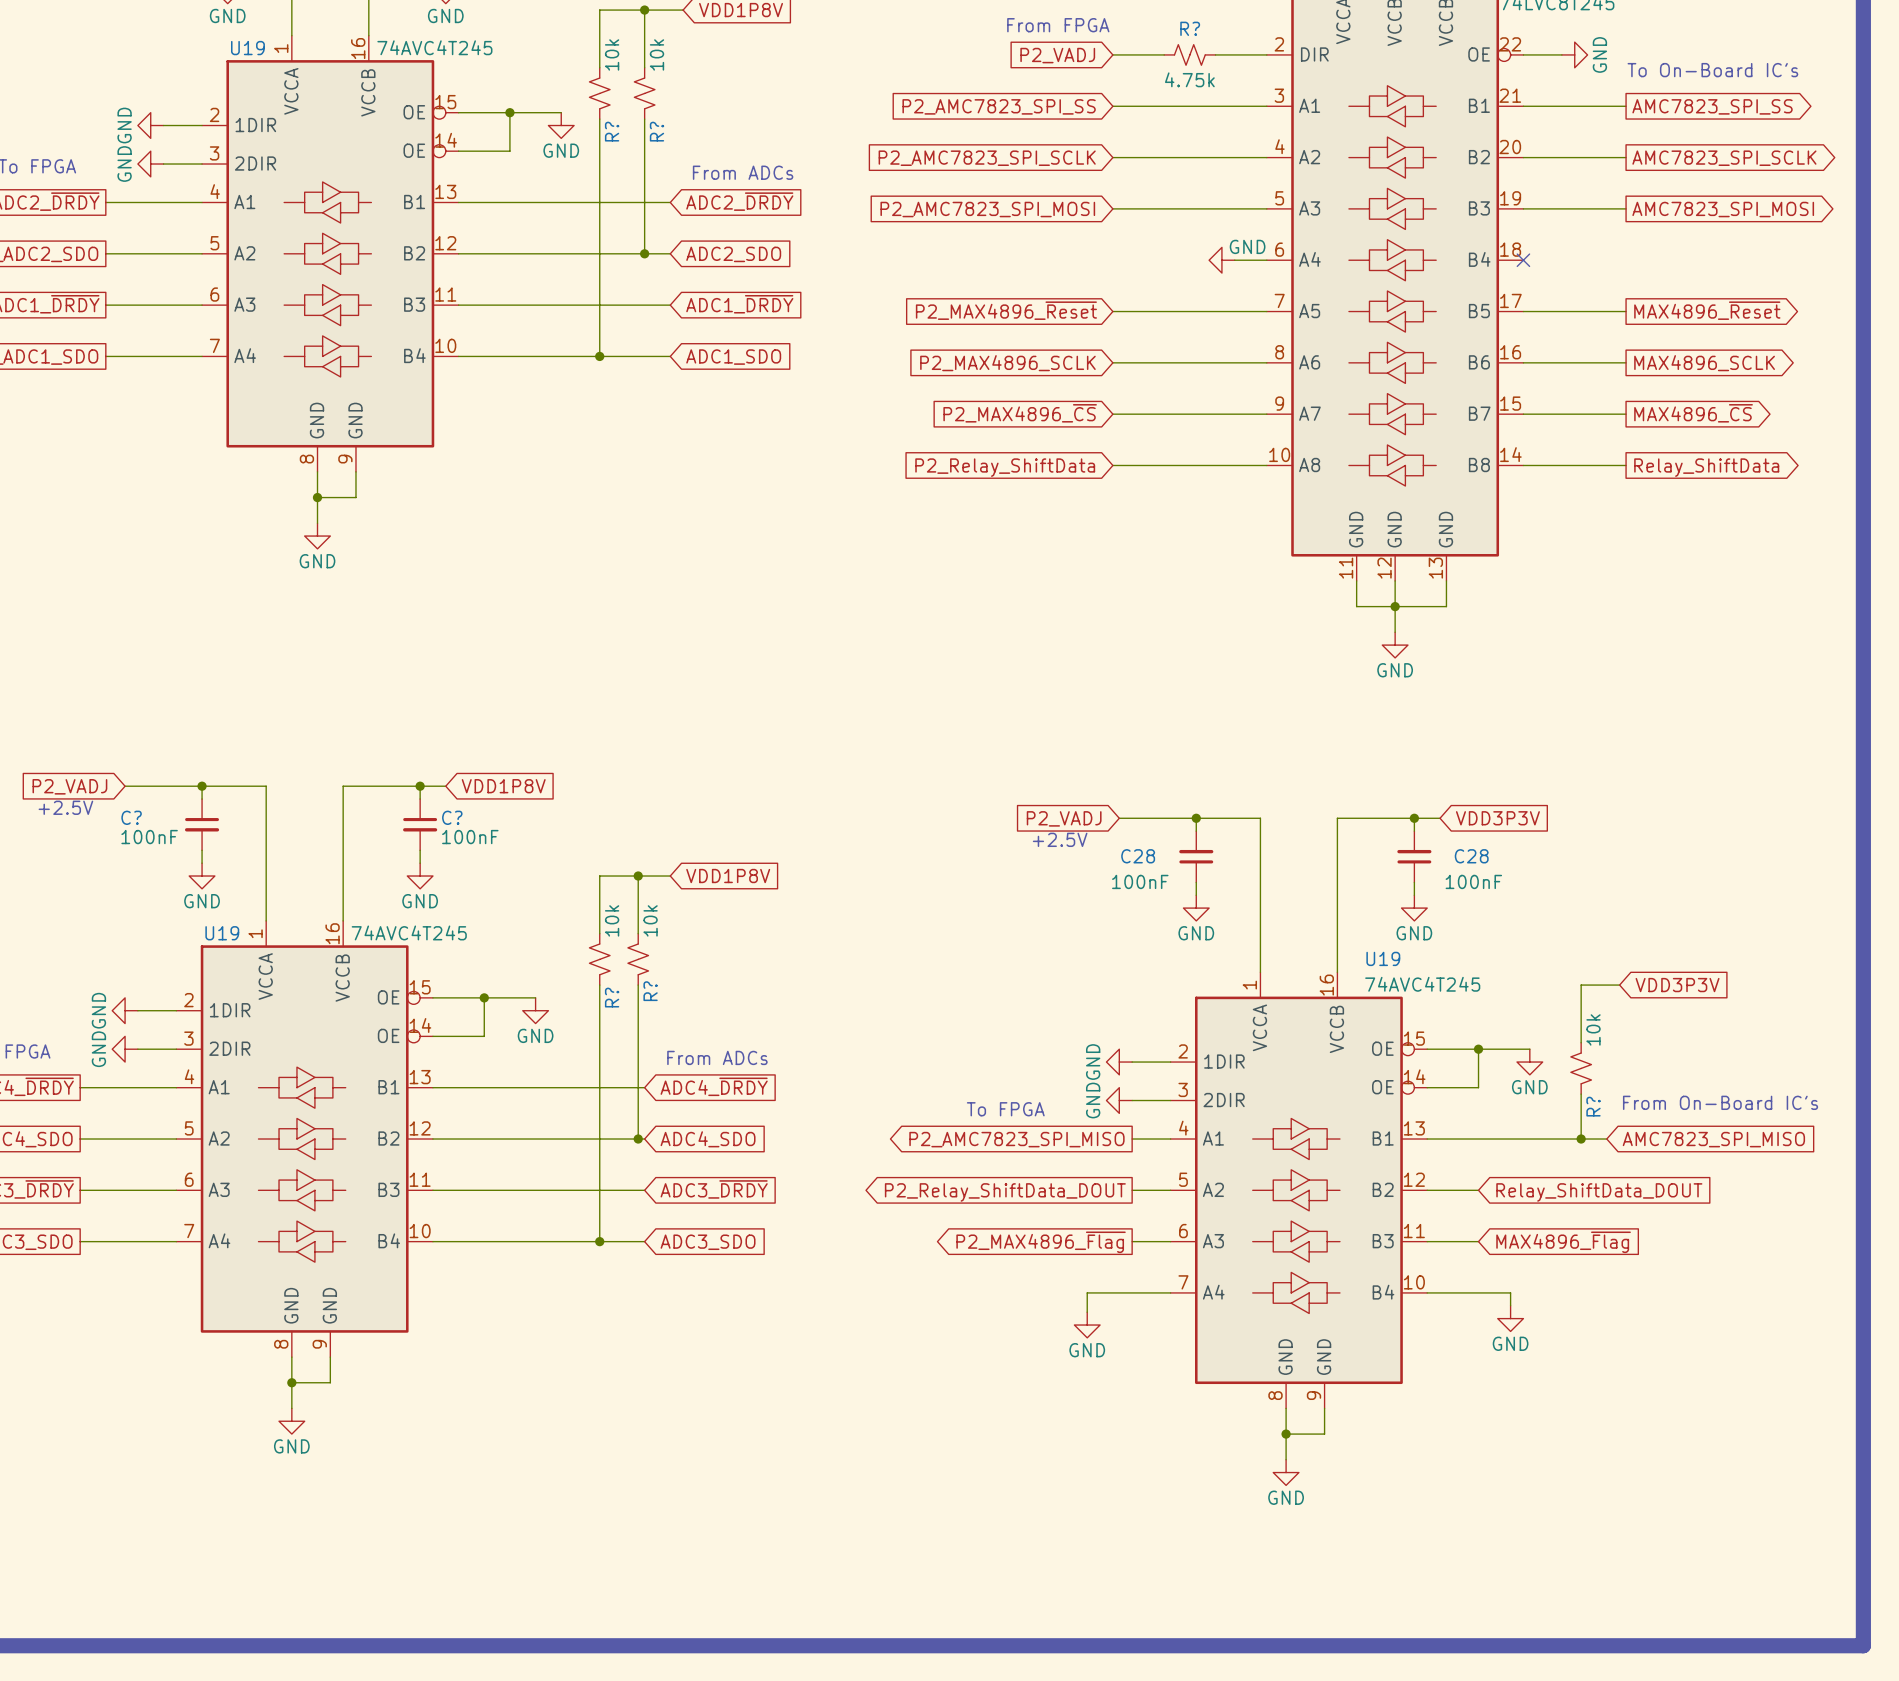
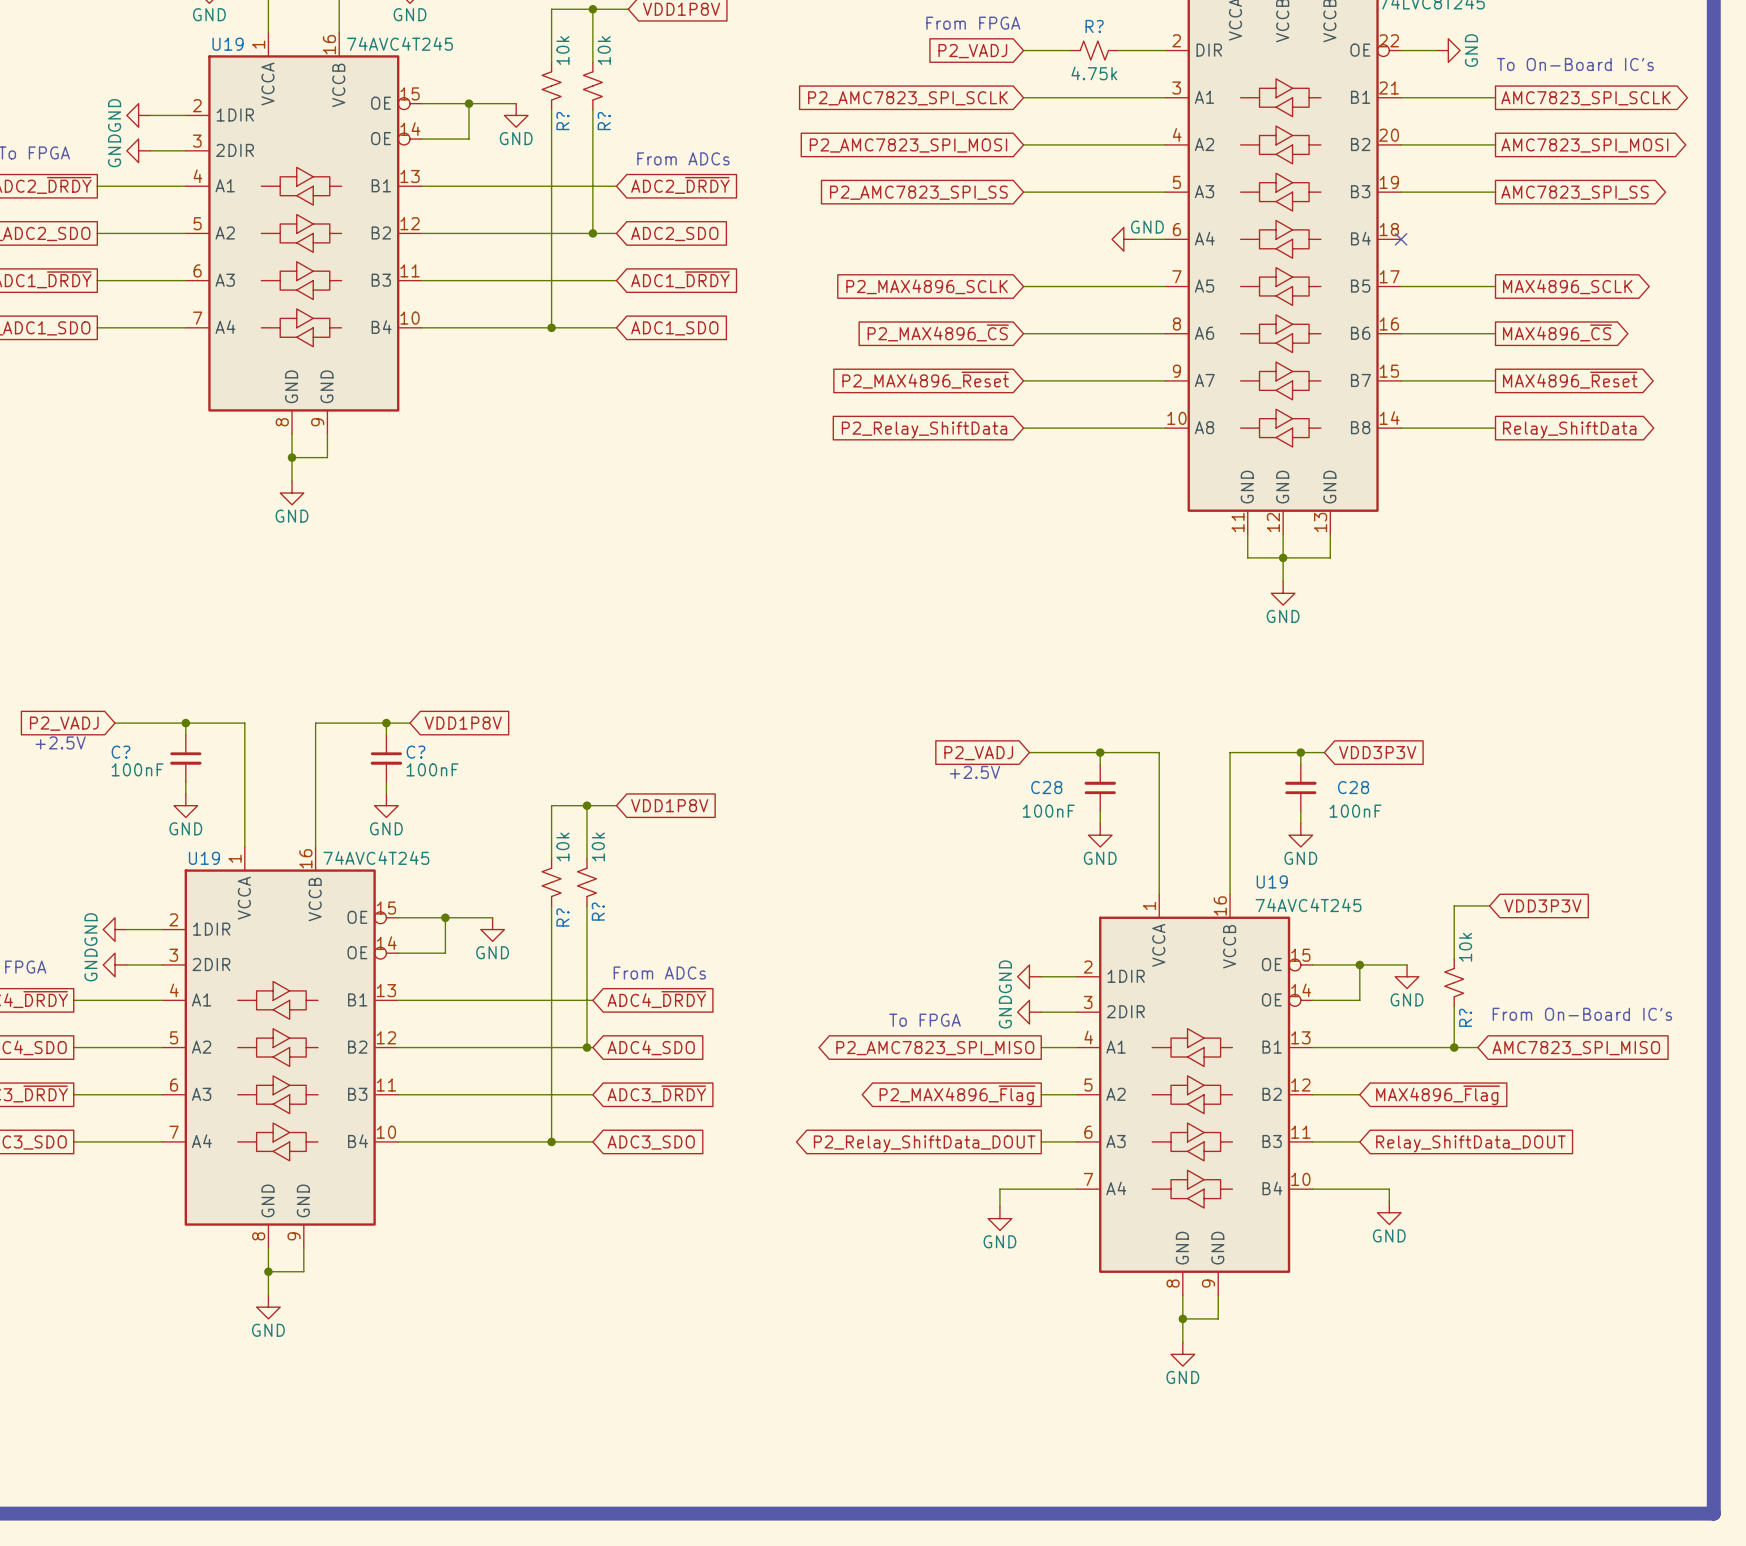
global label: P2_AMC7823_SPI_SS (999, 106) -> P2_AMC7823_SPI_SCLK (907, 98)
global label: AMC7823_SPI_SS (1712, 106) -> AMC7823_SPI_SCLK (1585, 98)
global label: P2_AMC7823_SPI_SCLK (987, 158) -> P2_AMC7823_SPI_MOSI (908, 145)
global label: AMC7823_SPI_SCLK (1724, 158) -> AMC7823_SPI_MOSI (1584, 145)
global label: P2_AMC7823_SPI_MOSI (987, 209) -> P2_AMC7823_SPI_SS (918, 192)
global label: AMC7823_SPI_MOSI (1723, 209) -> AMC7823_SPI_SS (1575, 192)
global label: P2_MAX4896_~{Reset} (1006, 310) -> P2_MAX4896_SCLK (927, 286)
global label: MAX4896_~{Reset} (1707, 310) -> MAX4896_SCLK (1567, 286)
global label: P2_MAX4896_SCLK (1007, 363) -> P2_MAX4896_~{CS} (938, 332)
global label: MAX4896_SCLK (1704, 363) -> MAX4896_~{CS} (1557, 332)
global label: P2_MAX4896_~{CS} (1020, 413) -> P2_MAX4896_~{Reset} (925, 380)
global label: MAX4896_~{CS} (1693, 413) -> MAX4896_~{Reset} (1570, 380)
global label: P2_Relay_ShiftData_DOUT (1005, 1192) -> P2_MAX4896_~{Flag} (957, 1095)
global label: Relay_ShiftData_DOUT (1599, 1192) -> MAX4896_~{Flag} (1438, 1095)
global label: P2_MAX4896_~{Flag} (1041, 1242) -> P2_Relay_ShiftData_DOUT (924, 1143)
global label: MAX4896_~{Flag} (1563, 1242) -> Relay_ShiftData_DOUT (1470, 1143)

